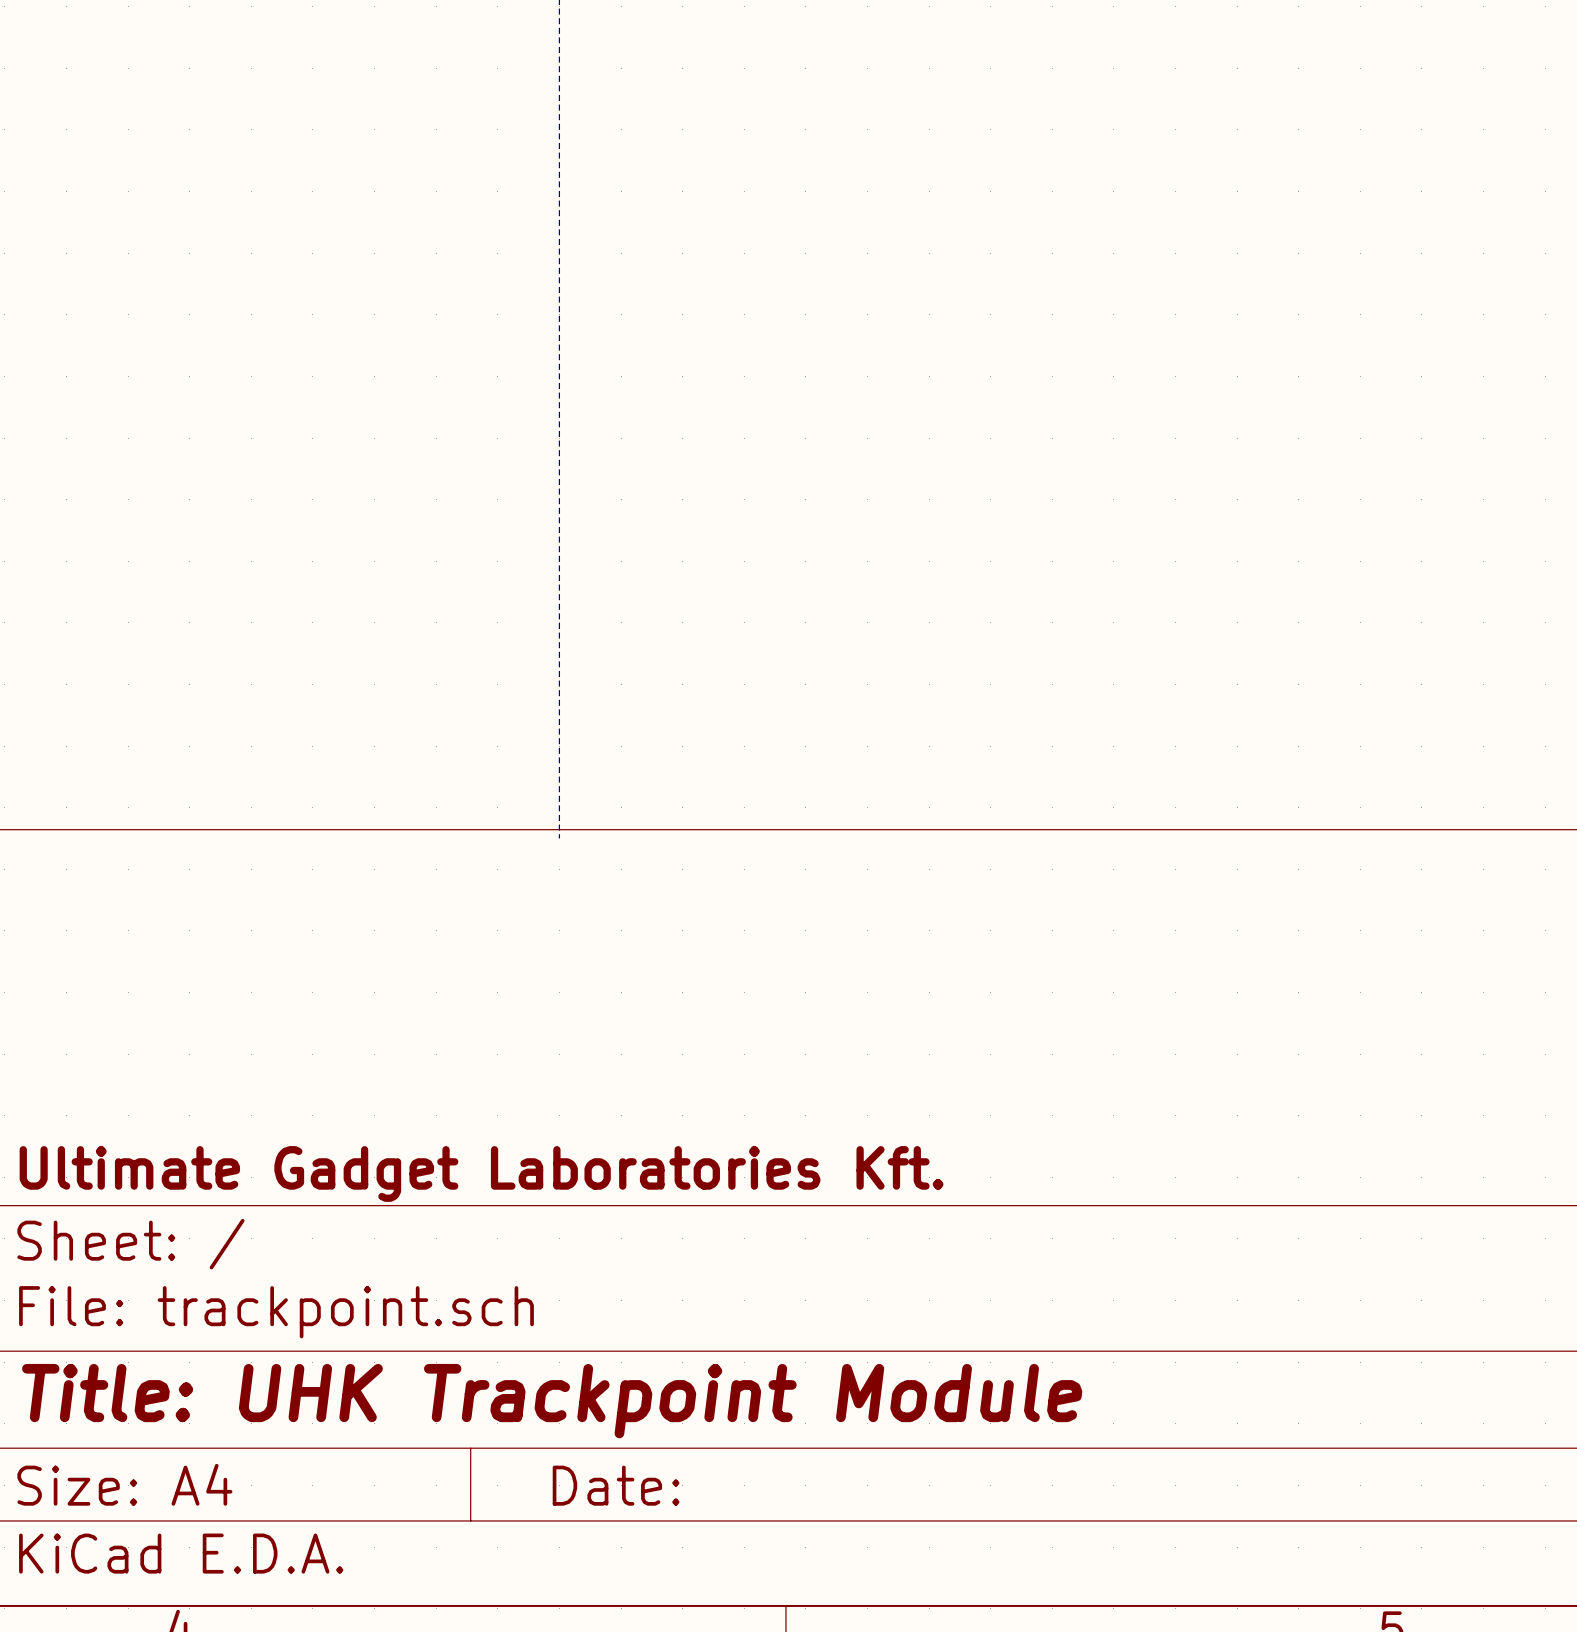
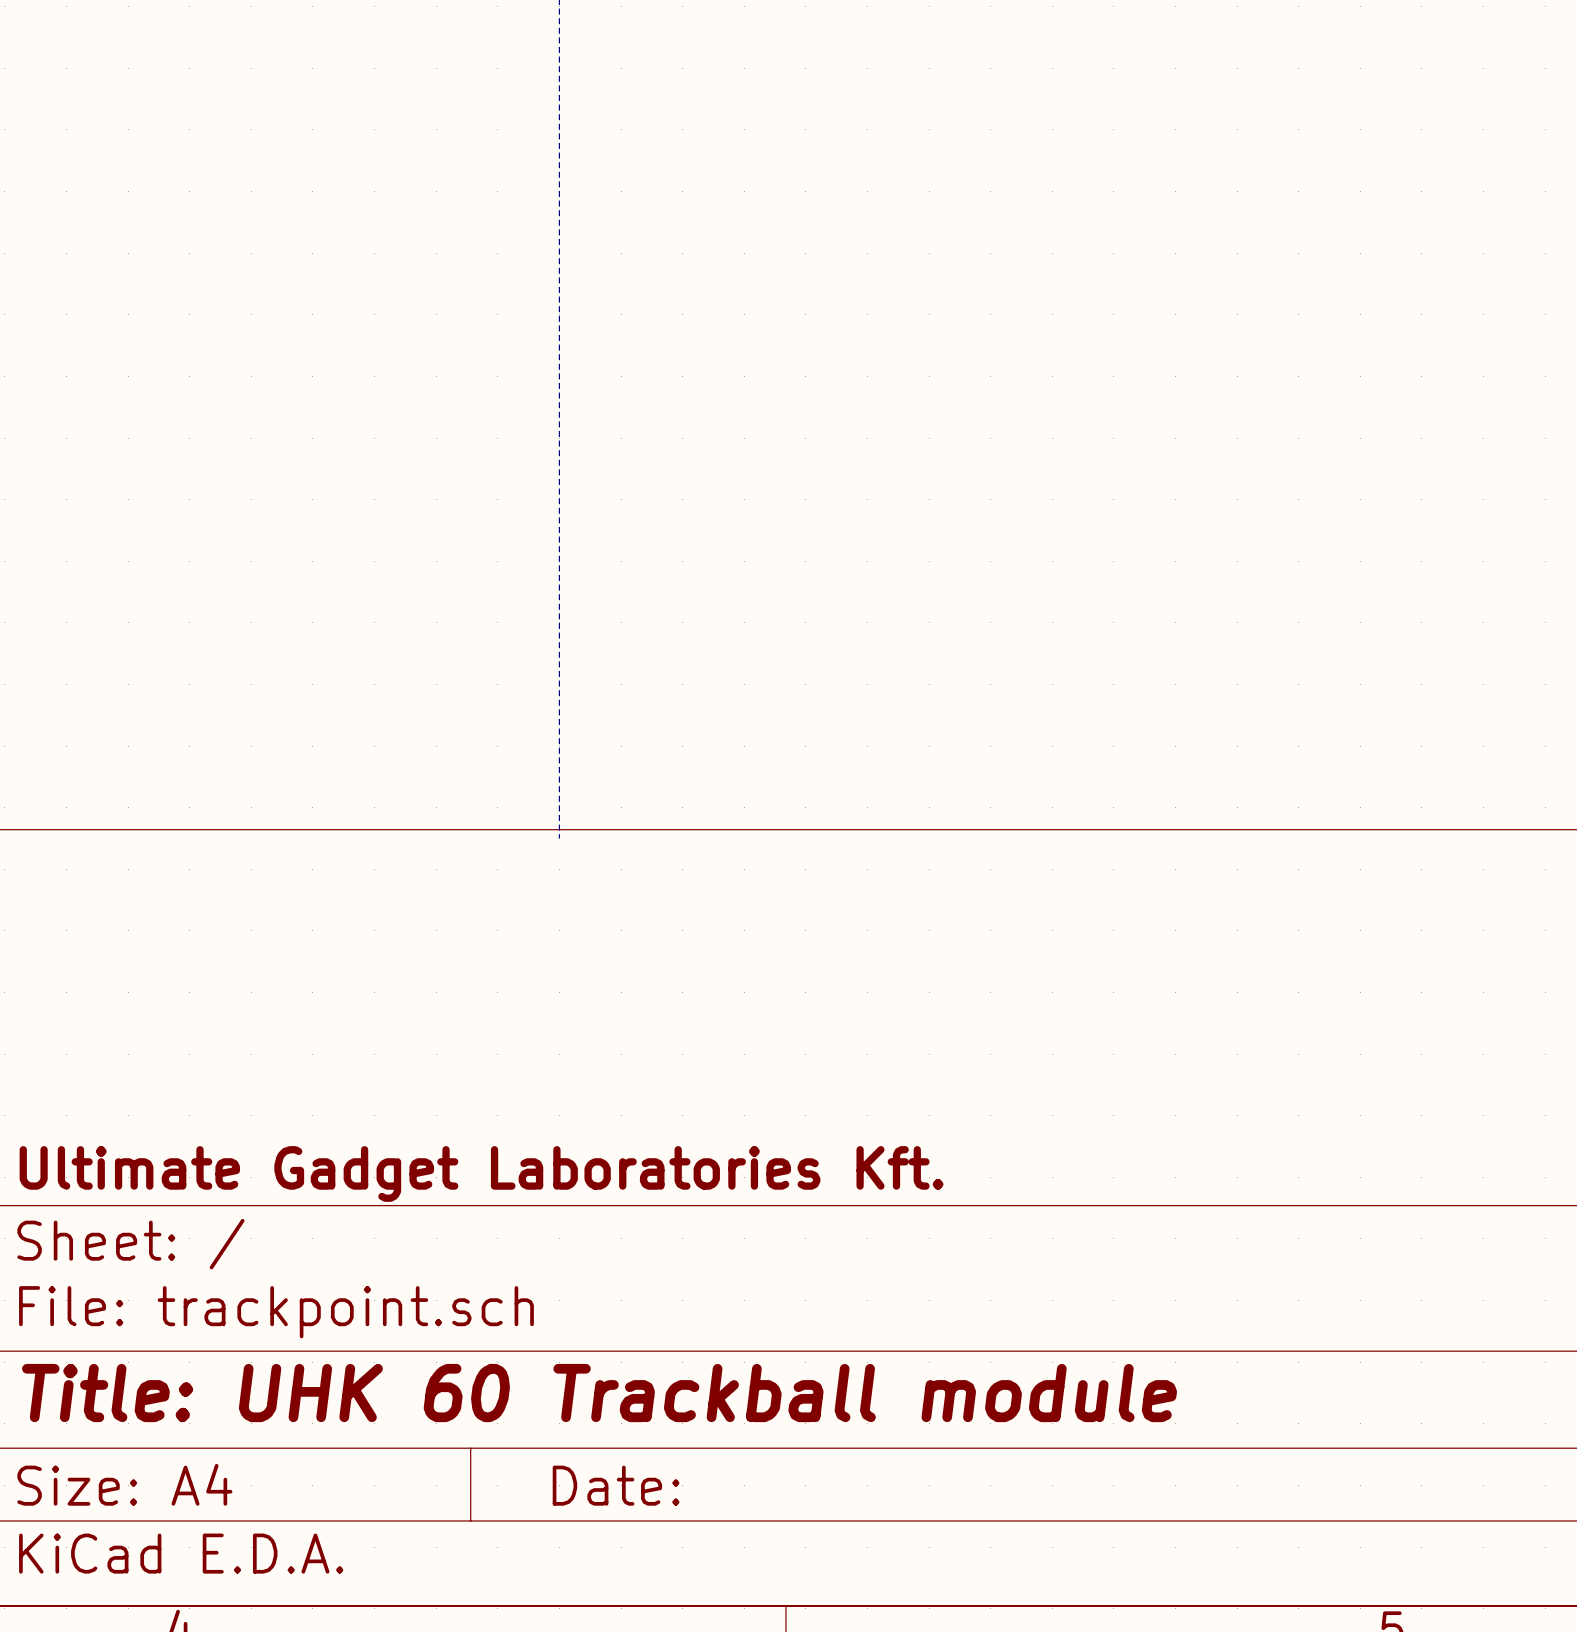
title block: Title: UHK Trackpoint Module (552, 1401) -> Title: UHK 60 Trackball module (599, 1393)

